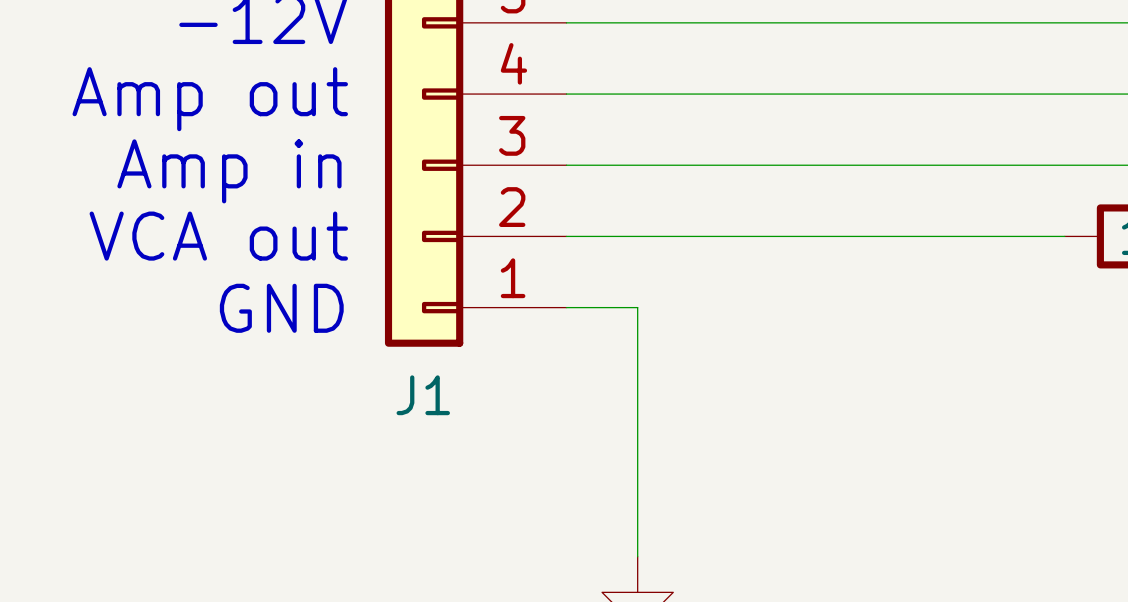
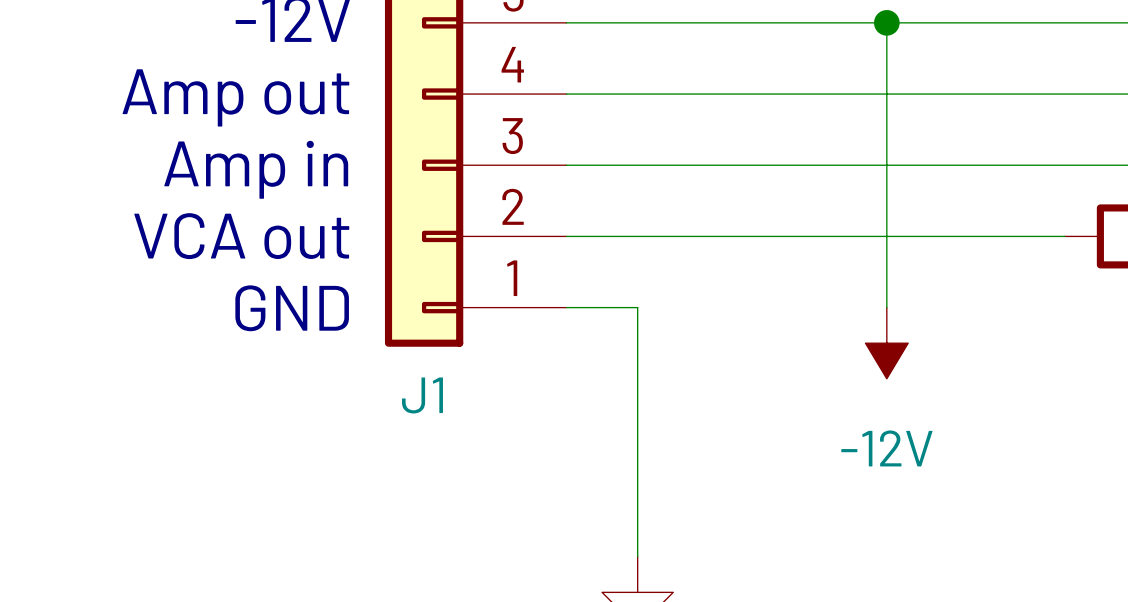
wire: none -> (886, 22) (886, 307)
junction: none -> (886, 22)
power symbol: none -> -12V (886, 343)

